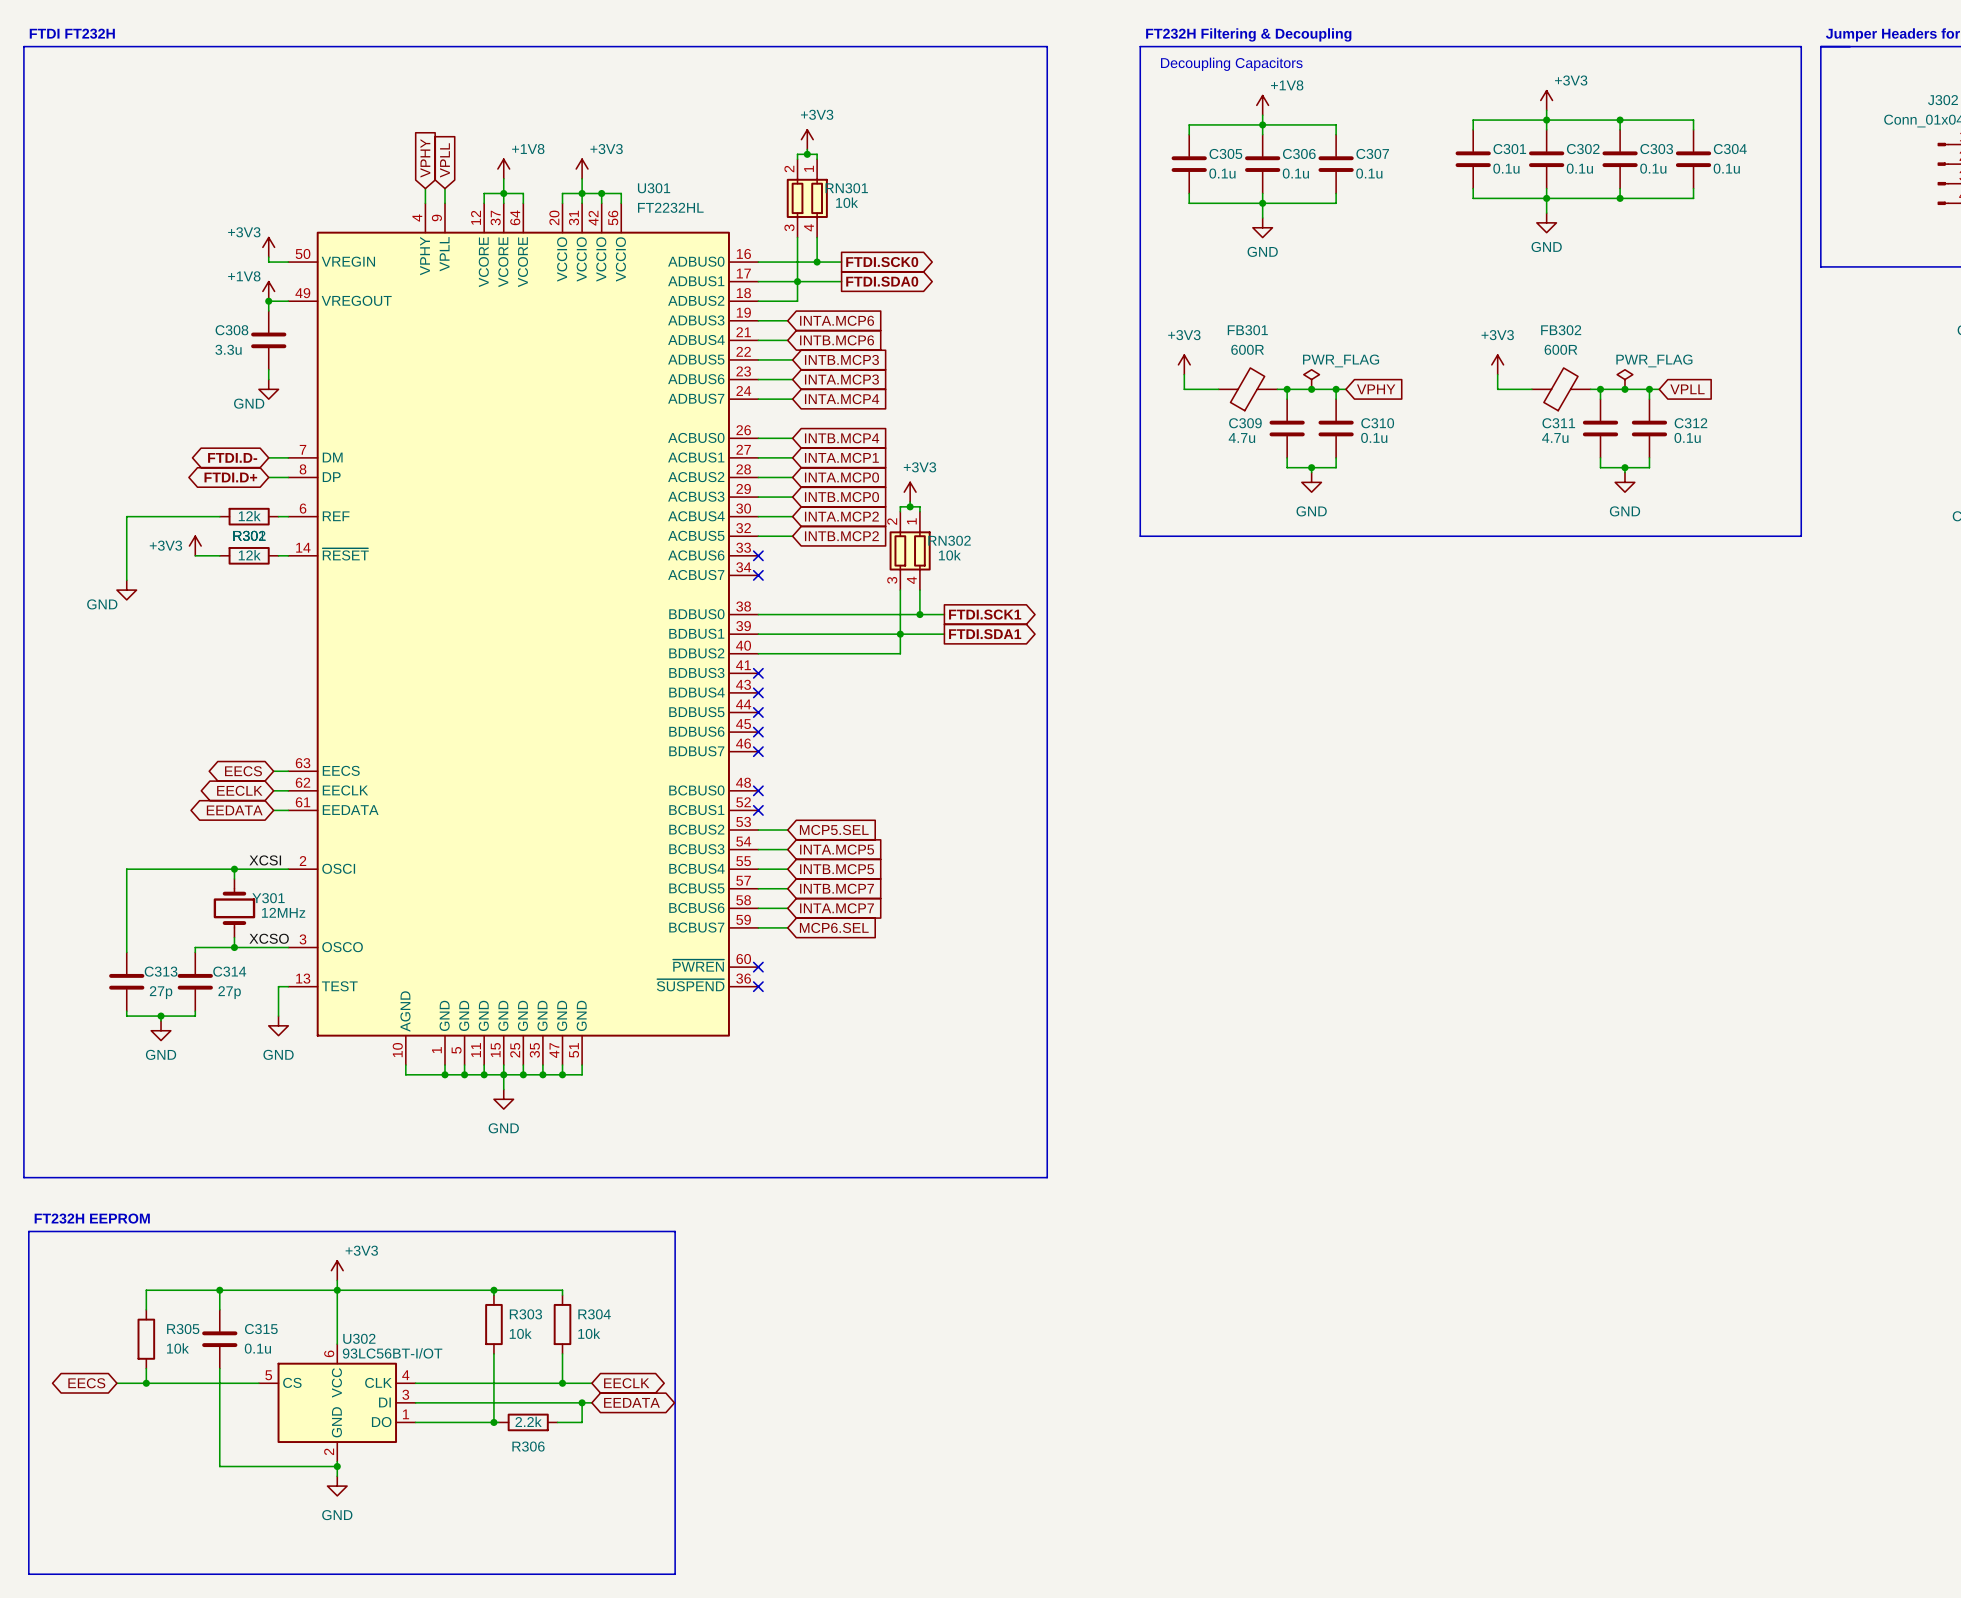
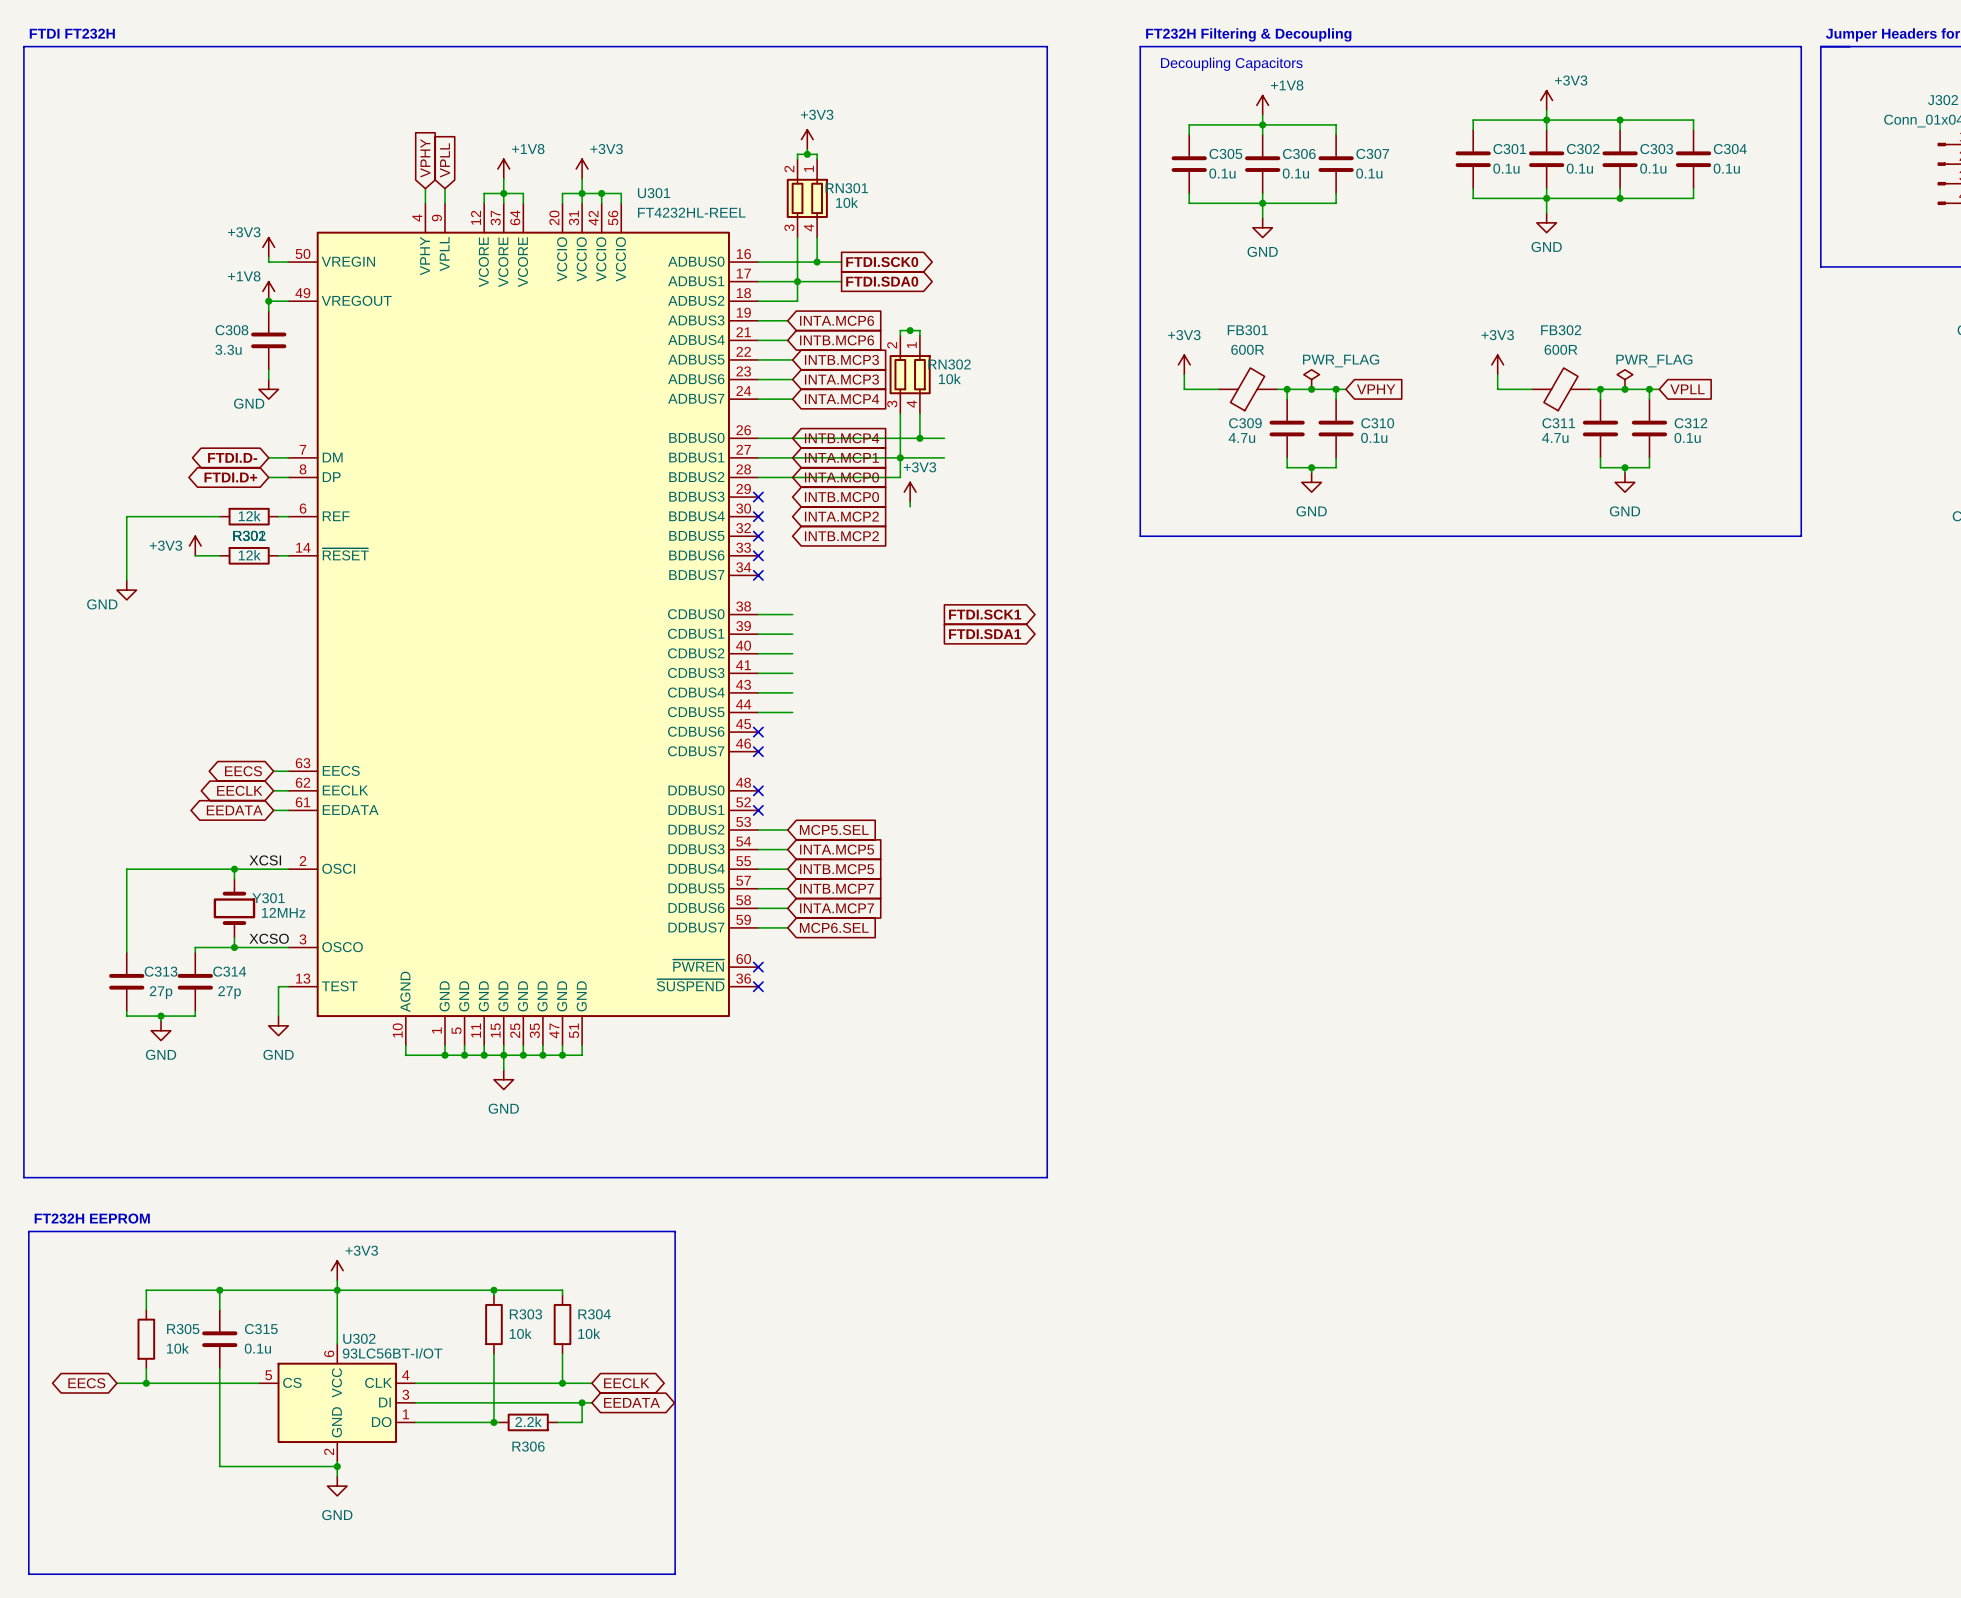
U301 symbol: [288, 203, 759, 1066] -> [288, 203, 759, 1046]
U301 value: FT2232HL (670, 207) -> FT4232HL-REEL (691, 212)
junction: none -> (910, 330)
junction: none -> (919, 438)
junction: none -> (900, 457)
wire: (758, 497) (792, 497) -> (758, 673) (792, 673)
no-connect mark: none -> (758, 497)
junction: (910, 506) -> none
wire: (900, 511) (900, 506) (919, 506) (919, 511) -> (900, 335) (900, 330) (919, 330) (919, 335)
wire: (758, 516) (792, 516) -> (758, 692) (792, 692)
no-connect mark: none -> (758, 516)
wire: (758, 536) (792, 536) -> (758, 712) (792, 712)
no-connect mark: none -> (758, 536)
RN302 position: (910, 550) -> (910, 374)
wire: (900, 590) (900, 653) (792, 653) -> (900, 413) (900, 477) (792, 477)
wire: (919, 590) (919, 614) -> (919, 413) (919, 438)
wire: (792, 614) (944, 614) -> (792, 438) (944, 438)
junction: (919, 614) -> none
wire: (792, 634) (944, 634) -> (792, 457) (944, 457)
junction: (900, 634) -> none
no-connect mark: (758, 673) -> none
no-connect mark: (758, 692) -> none
no-connect mark: (758, 712) -> none
junction: none -> (445, 1055)
junction: none -> (464, 1055)
junction: none -> (484, 1055)
junction: none -> (503, 1055)
junction: none -> (523, 1055)
junction: none -> (542, 1055)
junction: none -> (562, 1055)
wire: (405, 1065) (405, 1074) (582, 1074) (582, 1065) -> (405, 1045) (405, 1055) (582, 1055) (582, 1045)
junction: (445, 1074) -> none
junction: (464, 1074) -> none
junction: (484, 1074) -> none
junction: (503, 1074) -> none
junction: (523, 1074) -> none
junction: (542, 1074) -> none
junction: (562, 1074) -> none
power symbol position: GND (503, 1099) -> GND (503, 1079)

